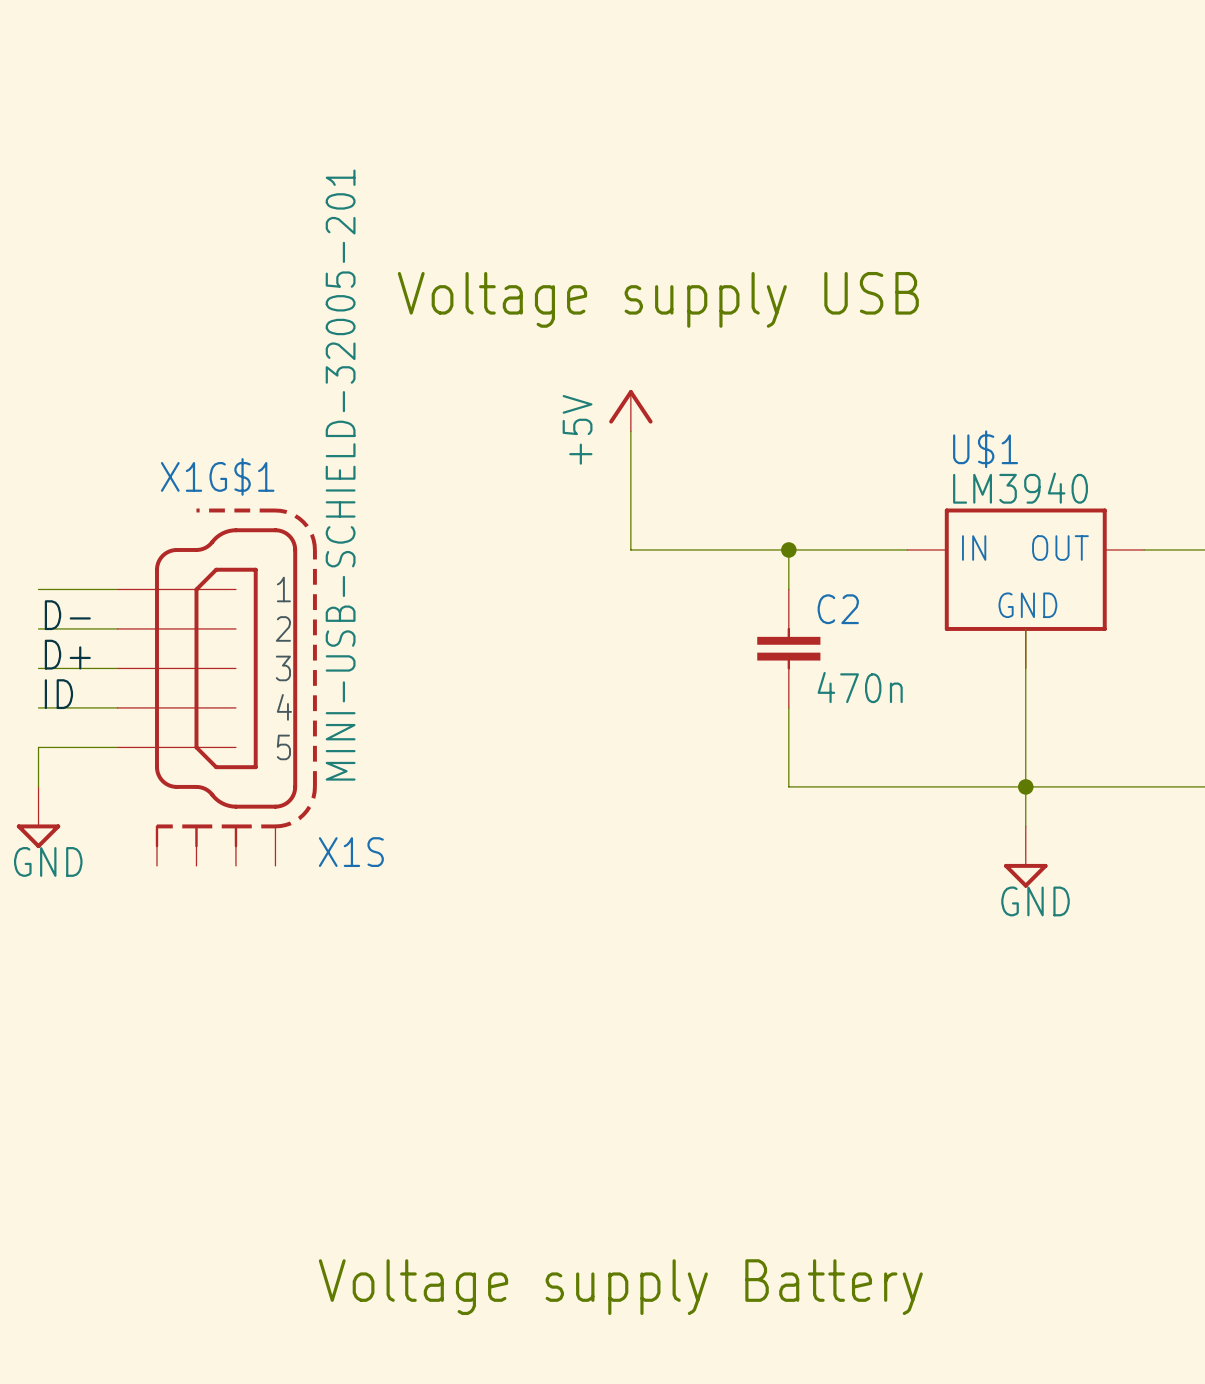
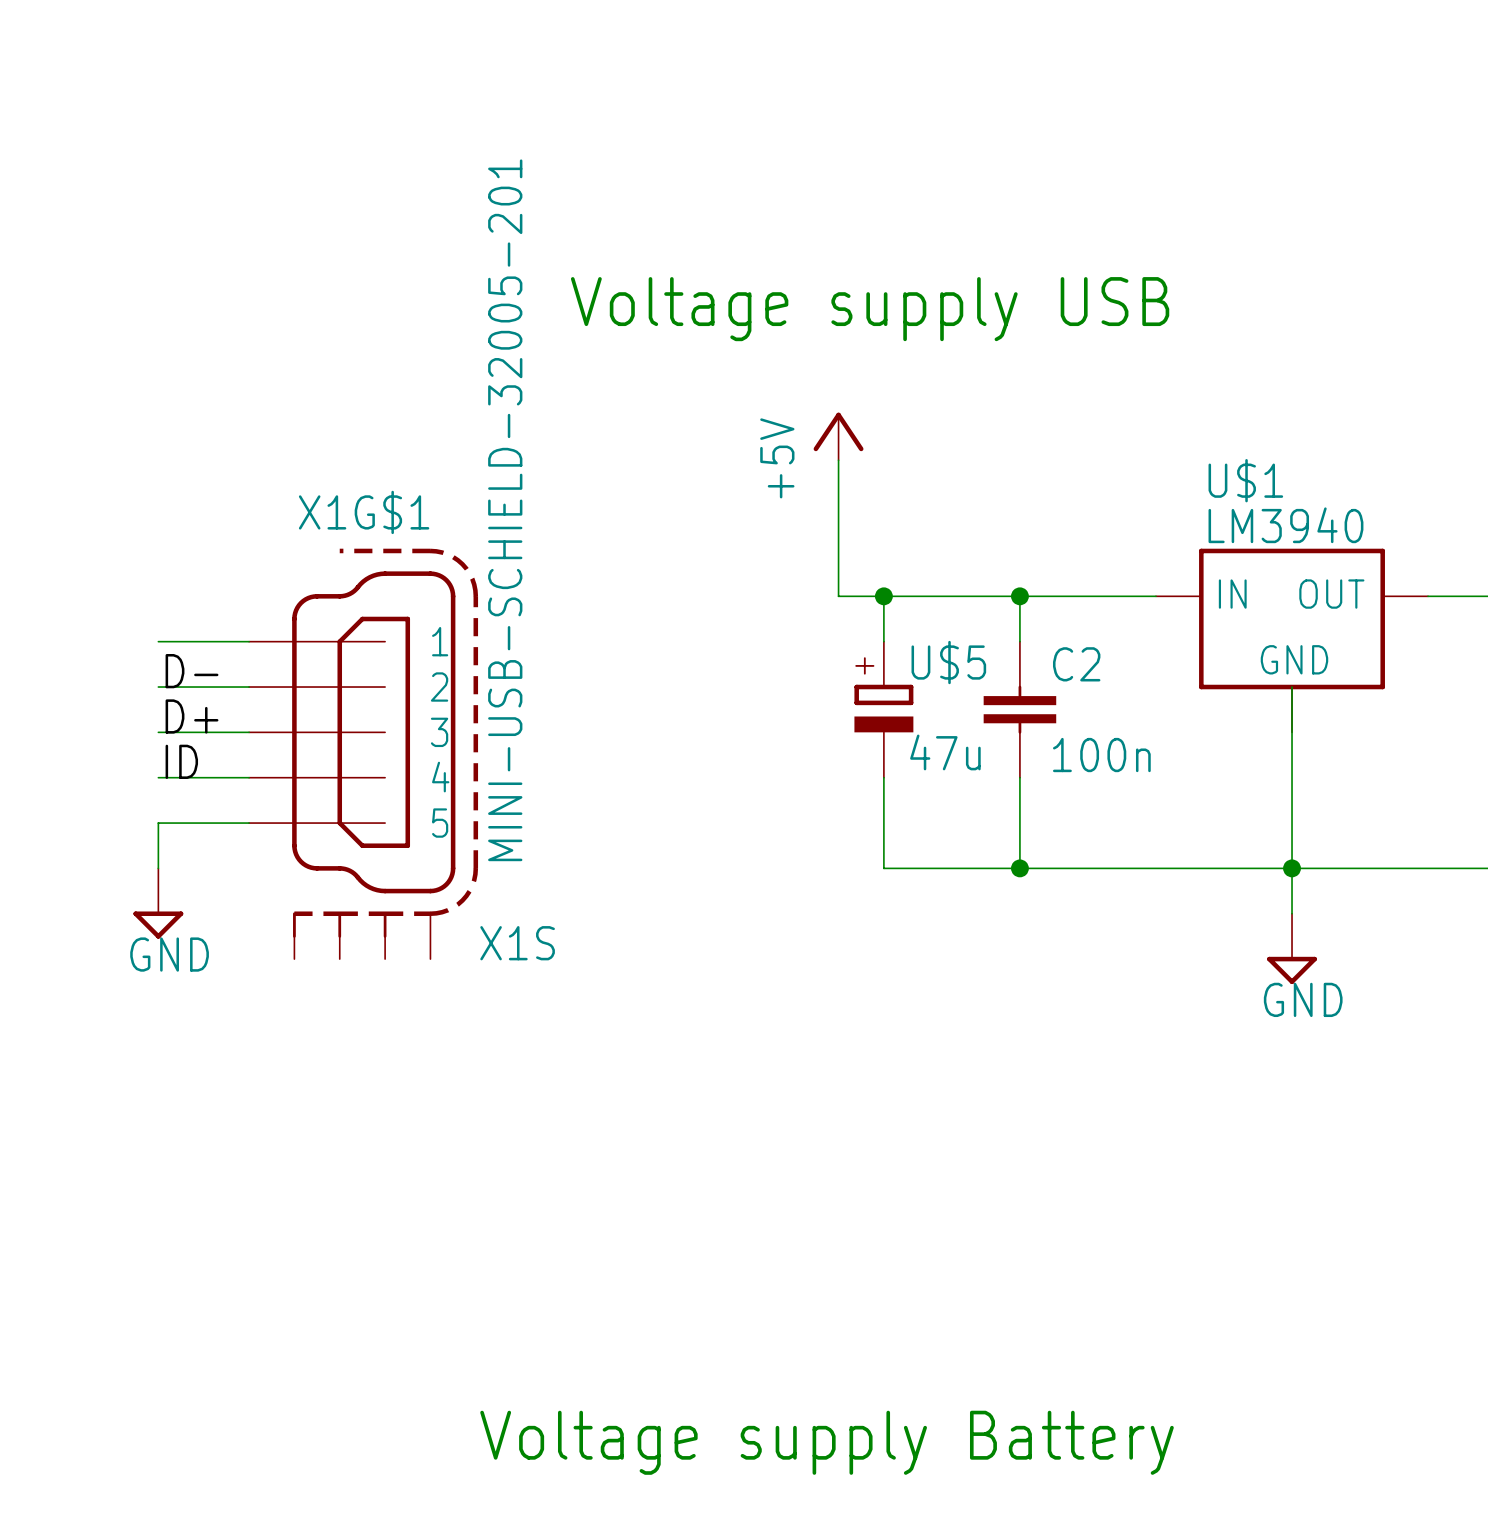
wire: none -> (883, 596) (883, 641)
junction: none -> (883, 596)
U$5: none -> 47u (883, 709)
C2 value: 470n (860, 687) -> 100n (1101, 755)
wire: none -> (883, 777) (883, 868) (1019, 868)
junction: none -> (1019, 868)

